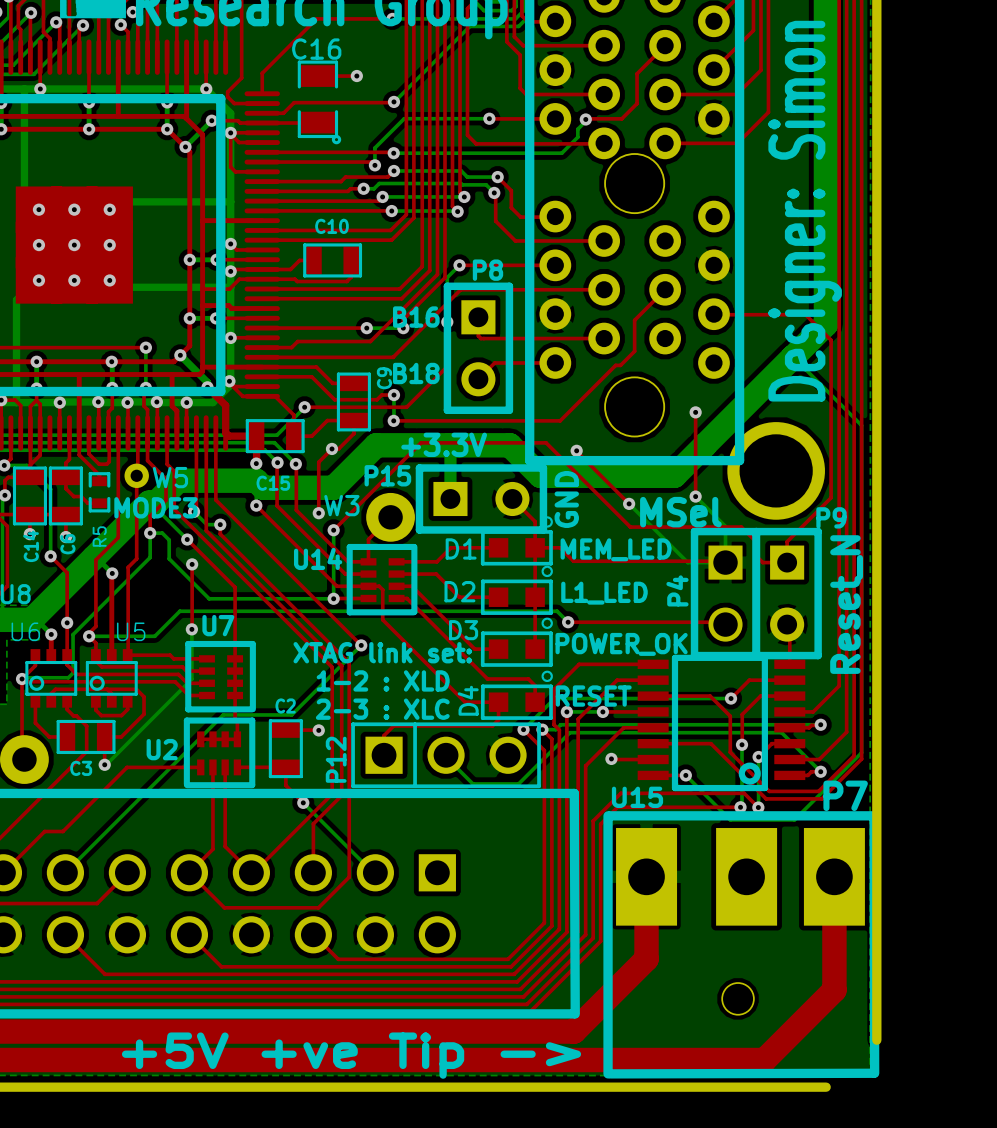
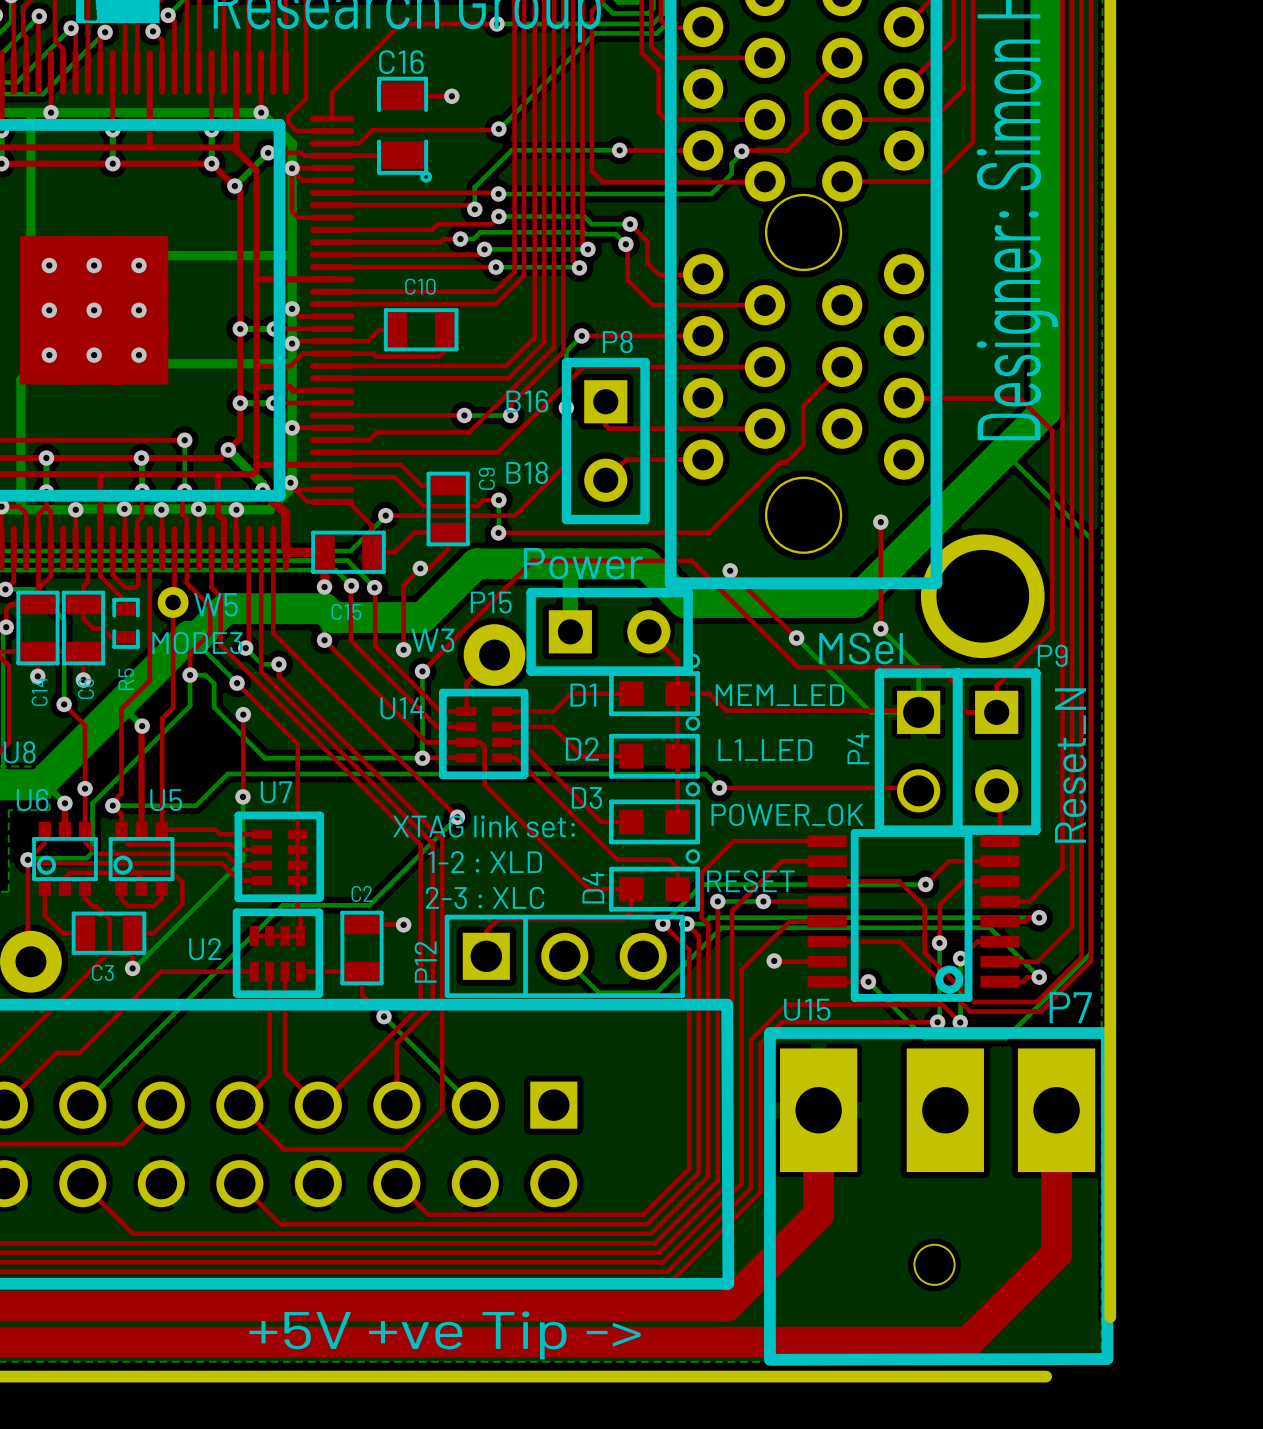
text: +3.3V (444, 444) -> none
P15 value: none -> Power (583, 563)
text: GND (566, 499) -> none

